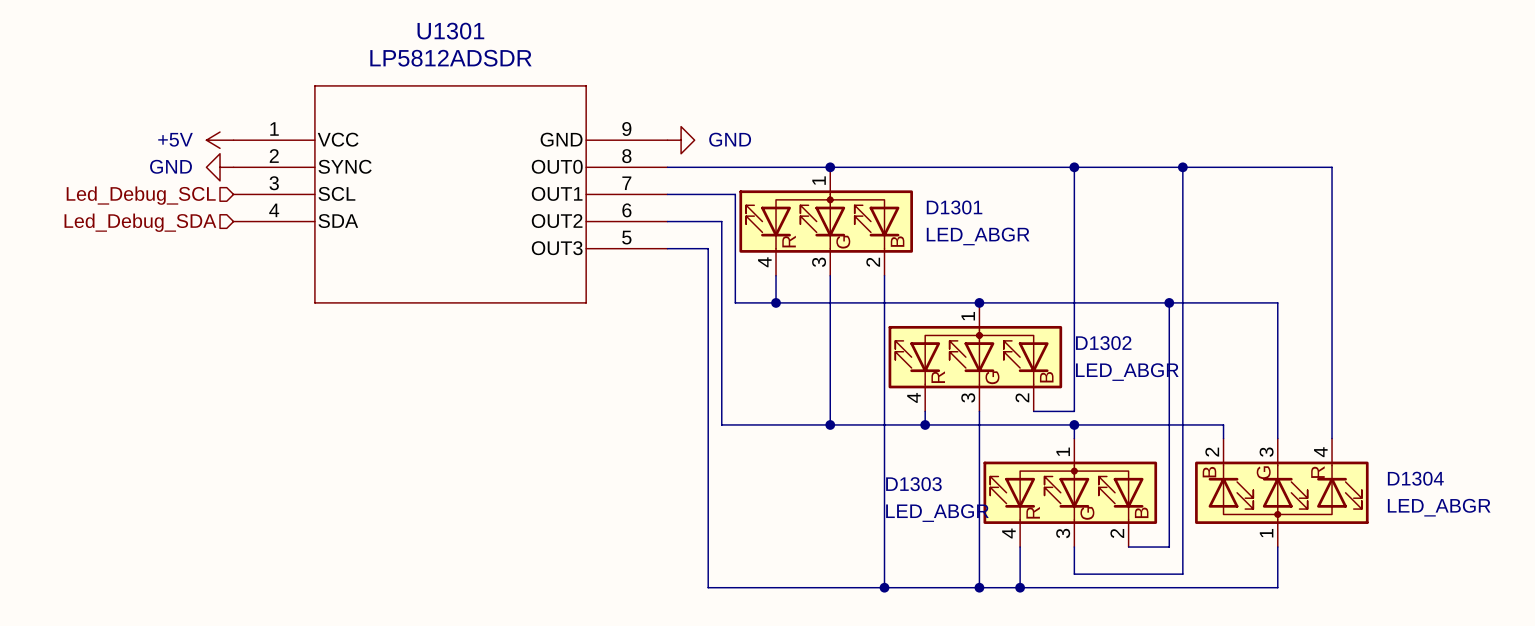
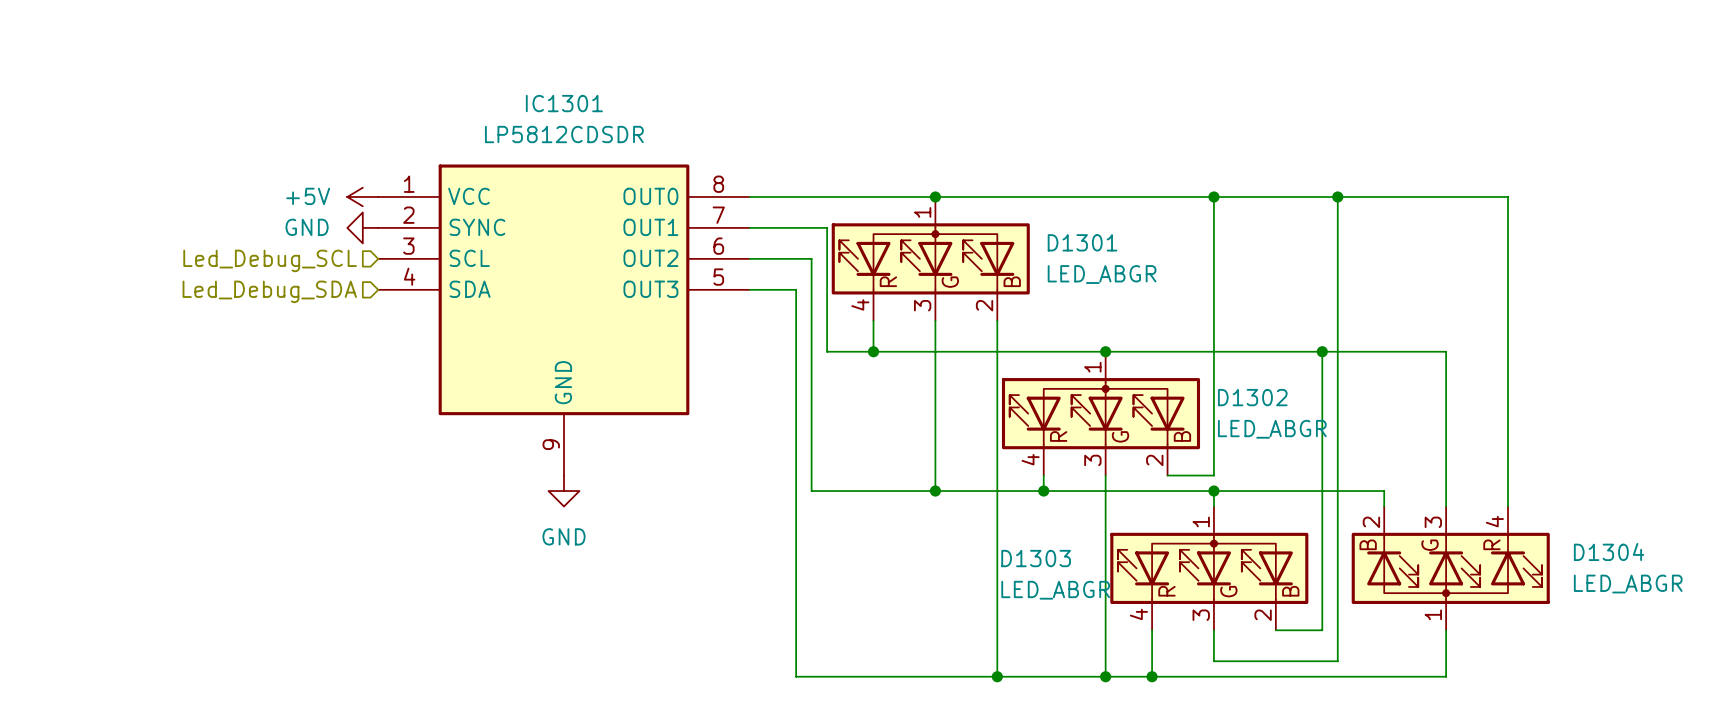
power symbol position: +5V (220, 140) -> +5V (362, 196)
power symbol: GND (681, 140) -> none
power symbol position: GND (220, 167) -> GND (362, 227)
U1301: LP5812ADSDR (450, 194) -> none
hierarchical label position: Led_Debug_SCL (141, 195) -> Led_Debug_SCL (270, 260)
hierarchical label position: Led_Debug_SDA (140, 222) -> Led_Debug_SDA (269, 291)
IC1301: none -> LP5812CDSDR (564, 320)
power symbol: none -> GND (564, 491)

